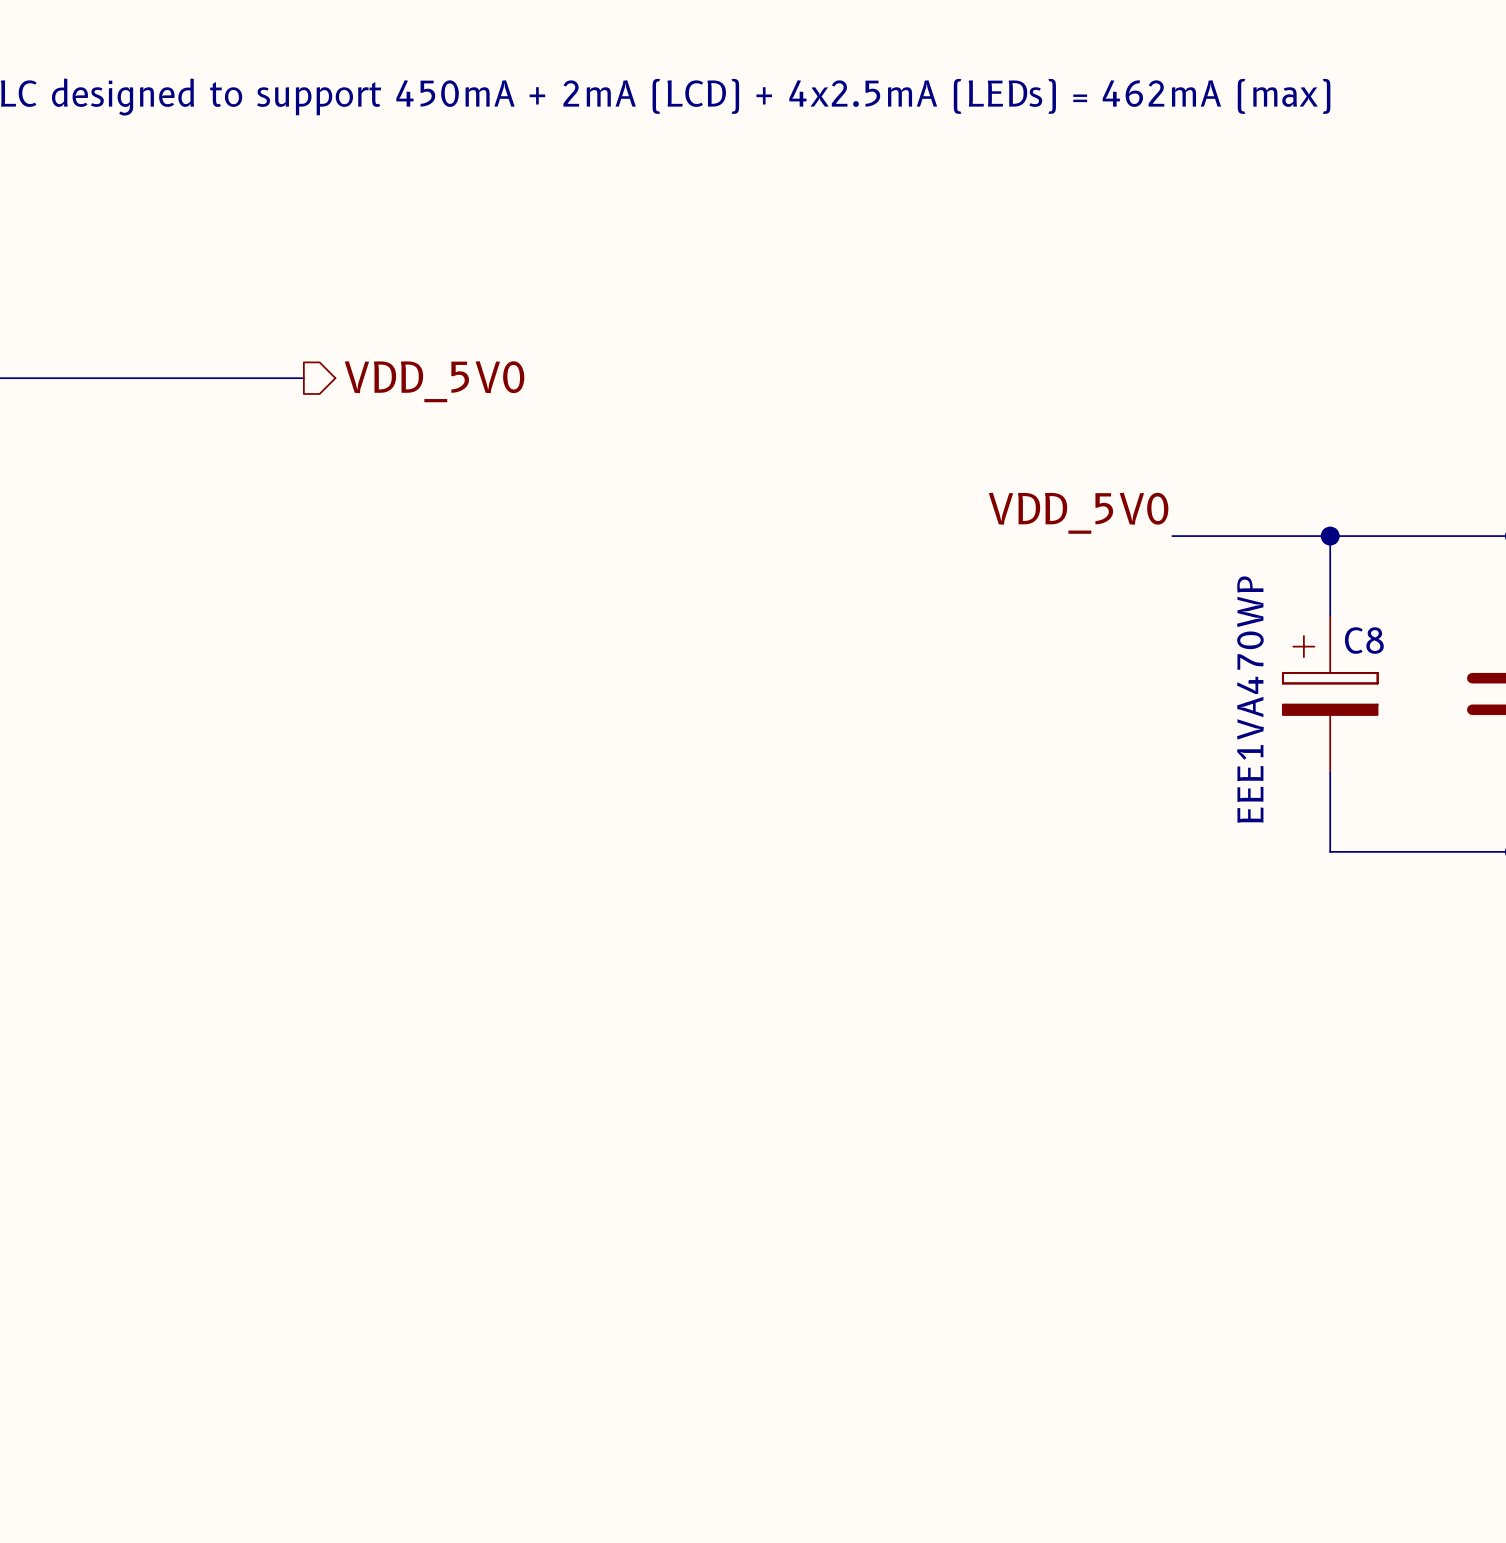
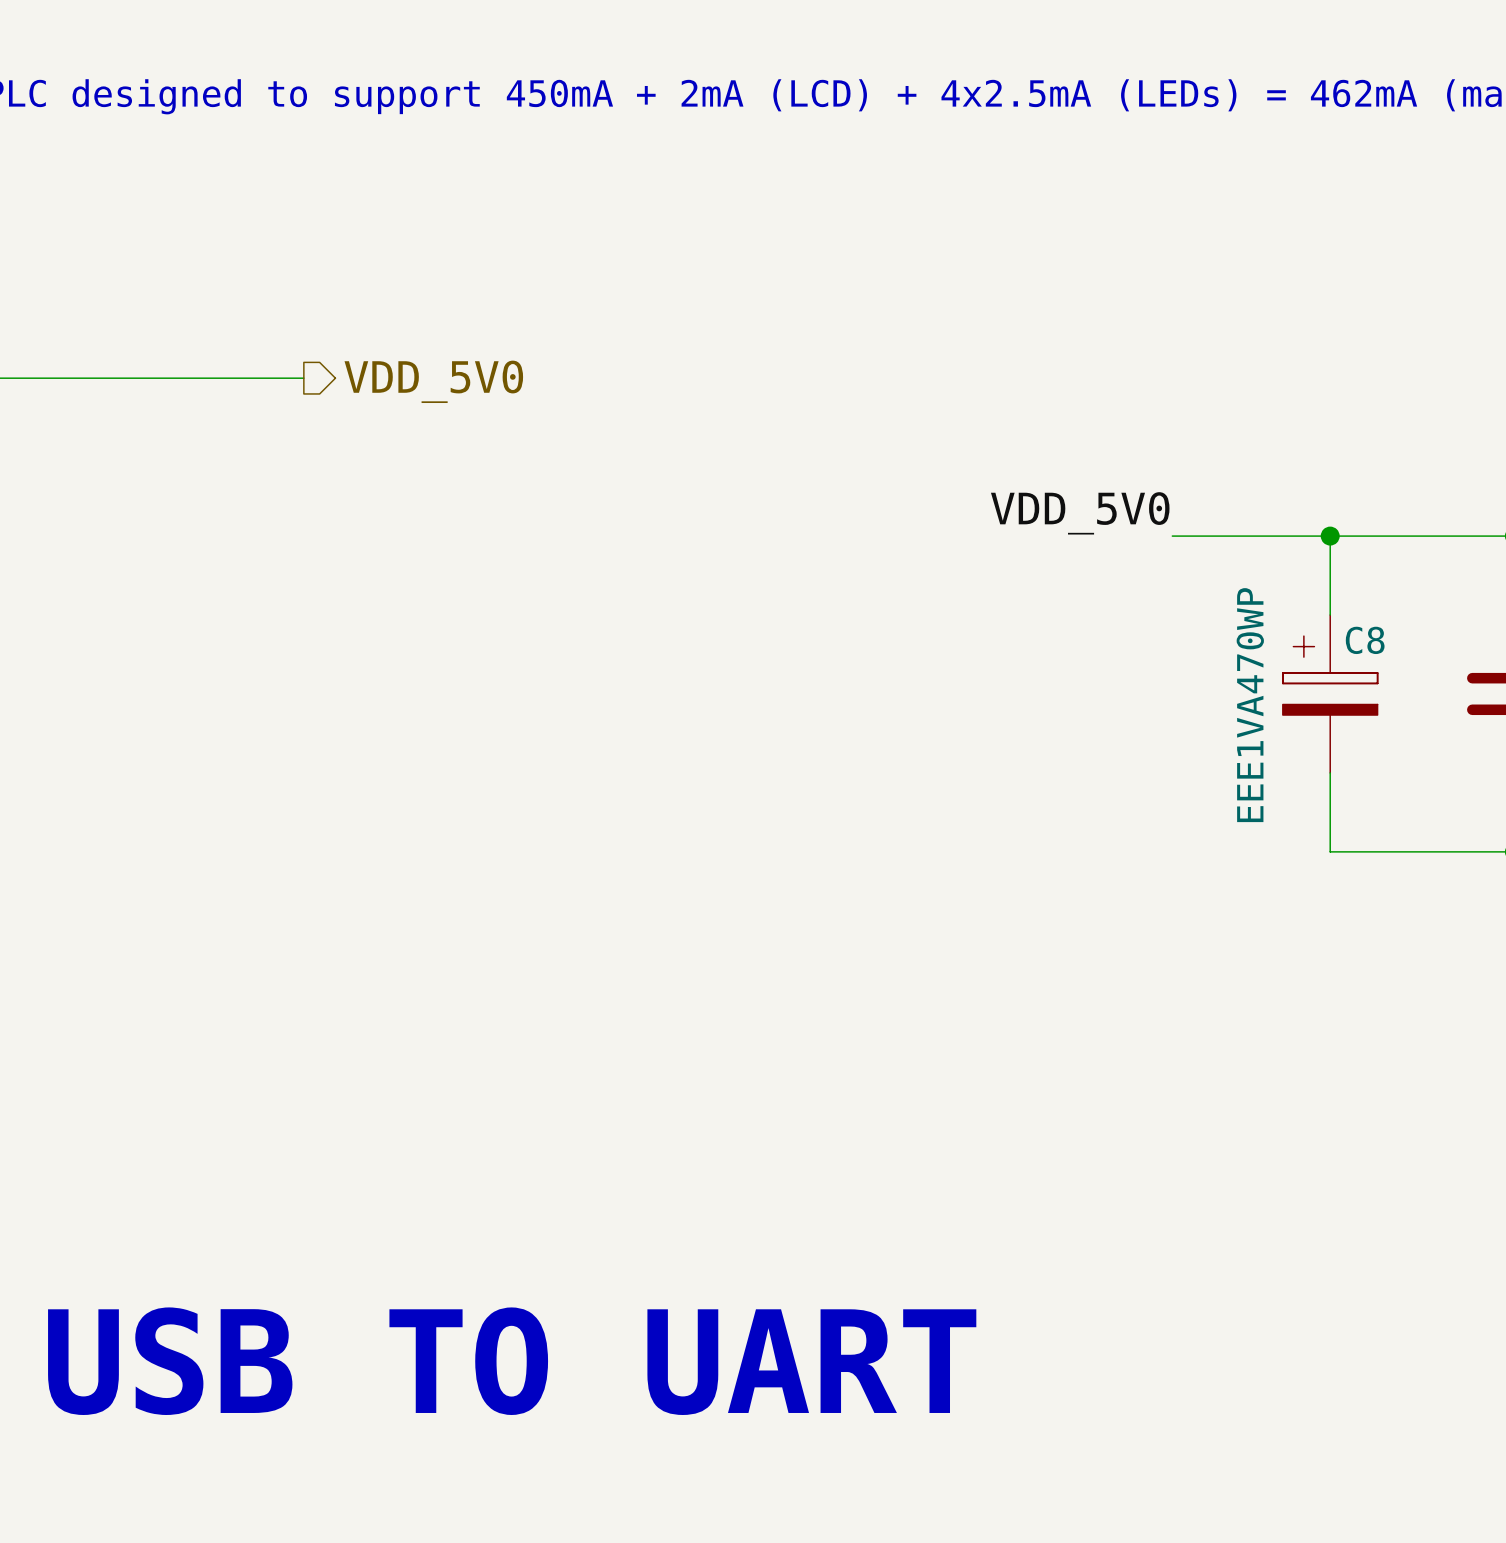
text: none -> USB TO UART (512, 1361)

